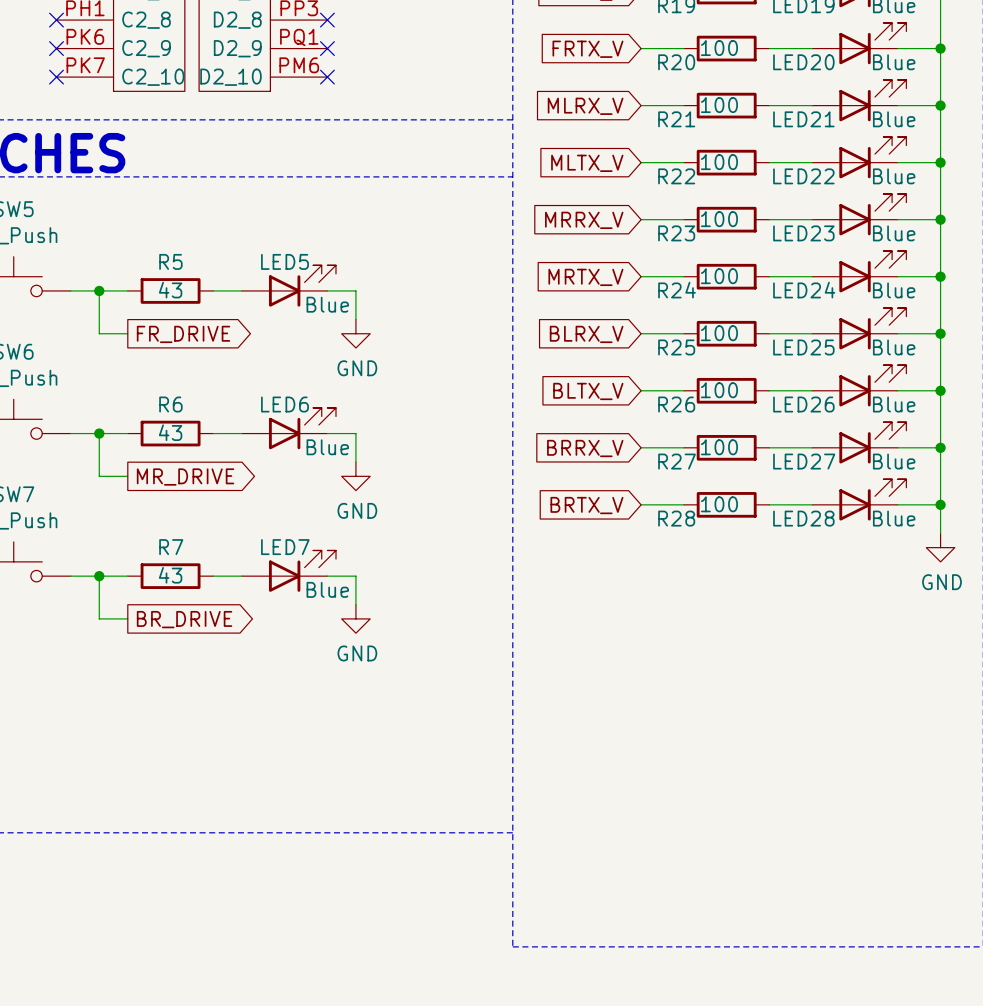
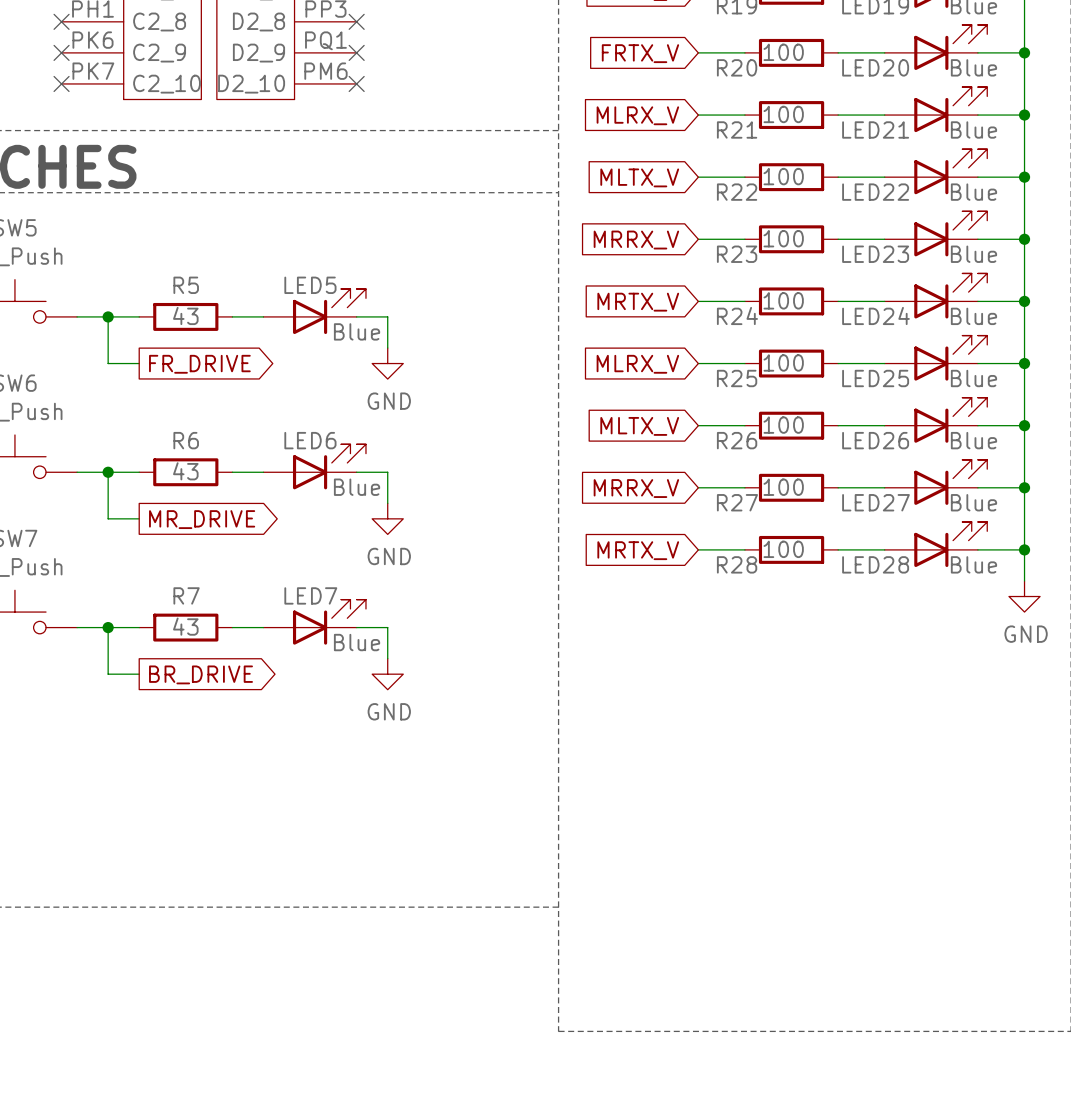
global label: BLRX_V (586, 334) -> MLRX_V (637, 364)
global label: BLTX_V (588, 391) -> MLTX_V (639, 426)
global label: BRRX_V (585, 448) -> MRRX_V (636, 488)
global label: BRTX_V (586, 505) -> MRTX_V (638, 550)

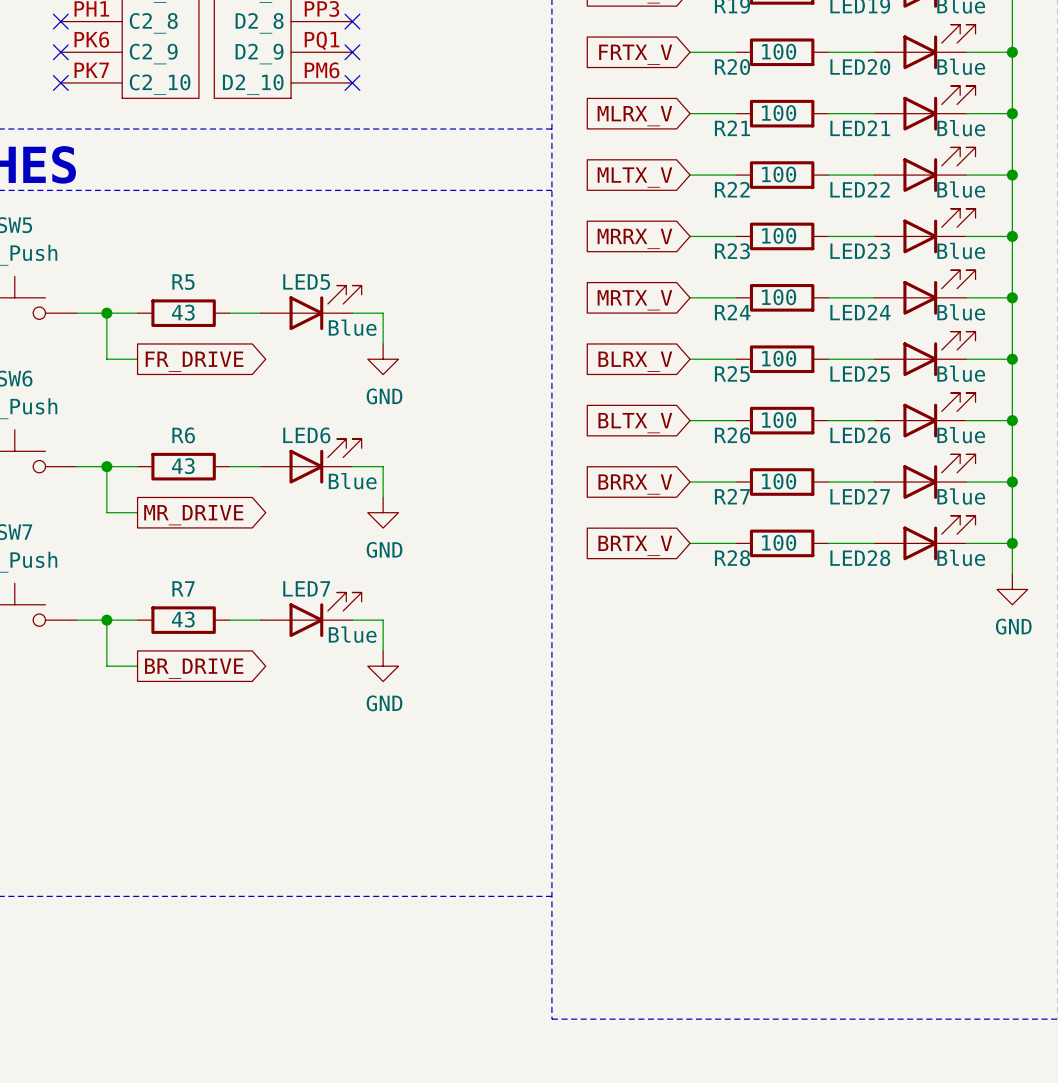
global label: MLRX_V (637, 364) -> BLRX_V (635, 361)
global label: MLTX_V (639, 426) -> BLTX_V (635, 423)
global label: MRRX_V (636, 488) -> BRRX_V (635, 484)
global label: MRTX_V (638, 550) -> BRTX_V (635, 545)

